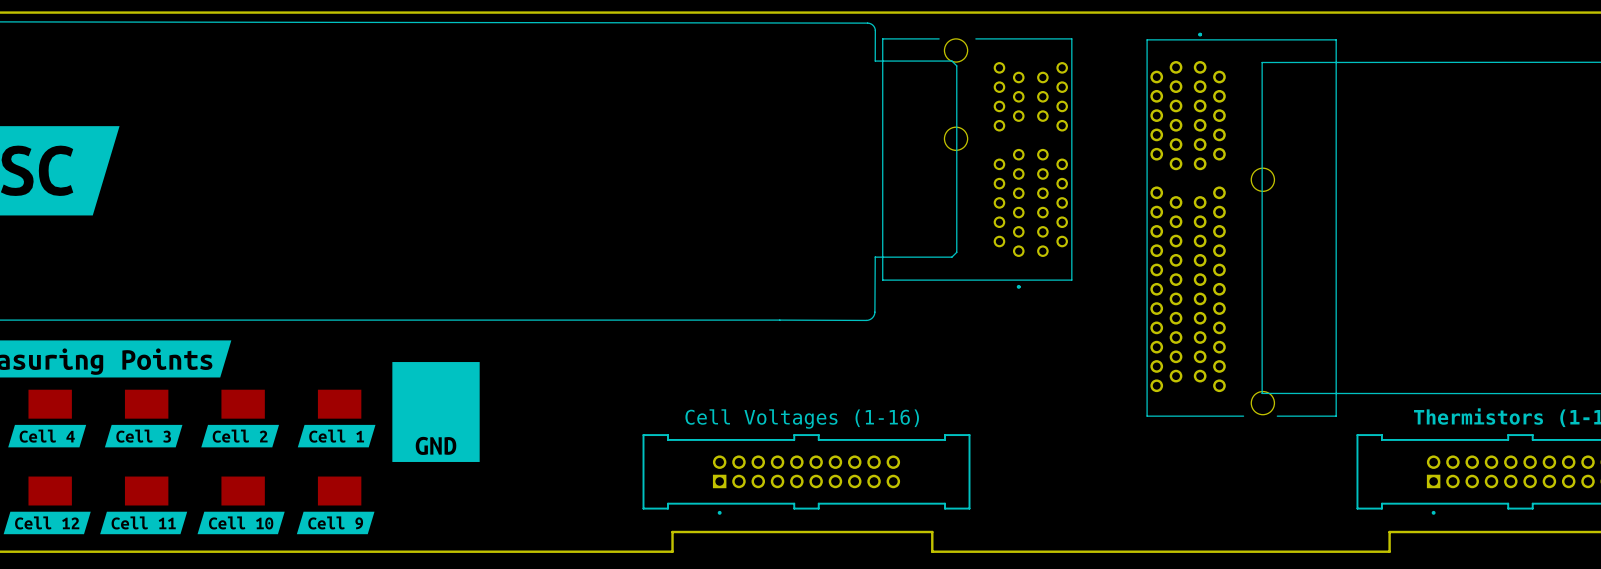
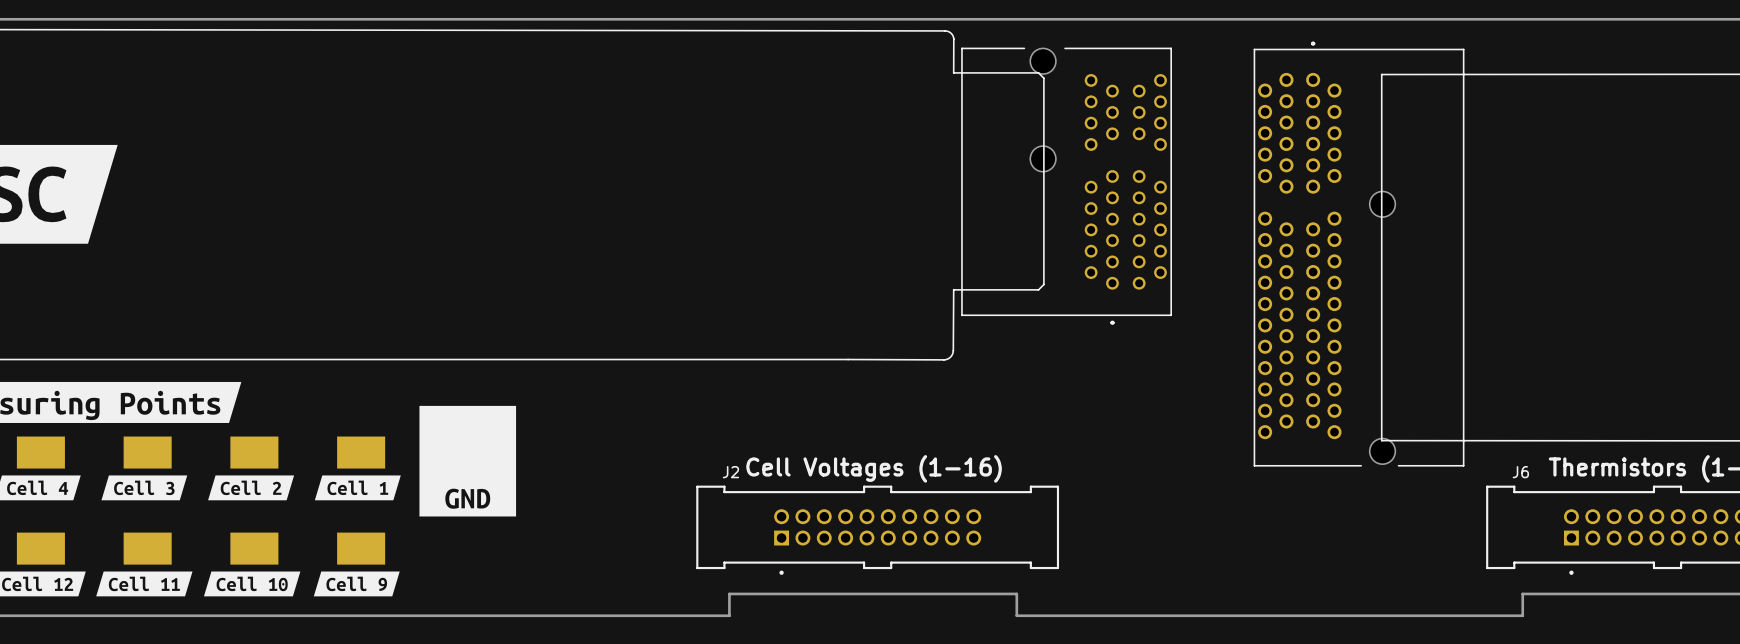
J2 name: none -> J2 (730, 472)
J6 name: none -> J6 (1520, 472)

